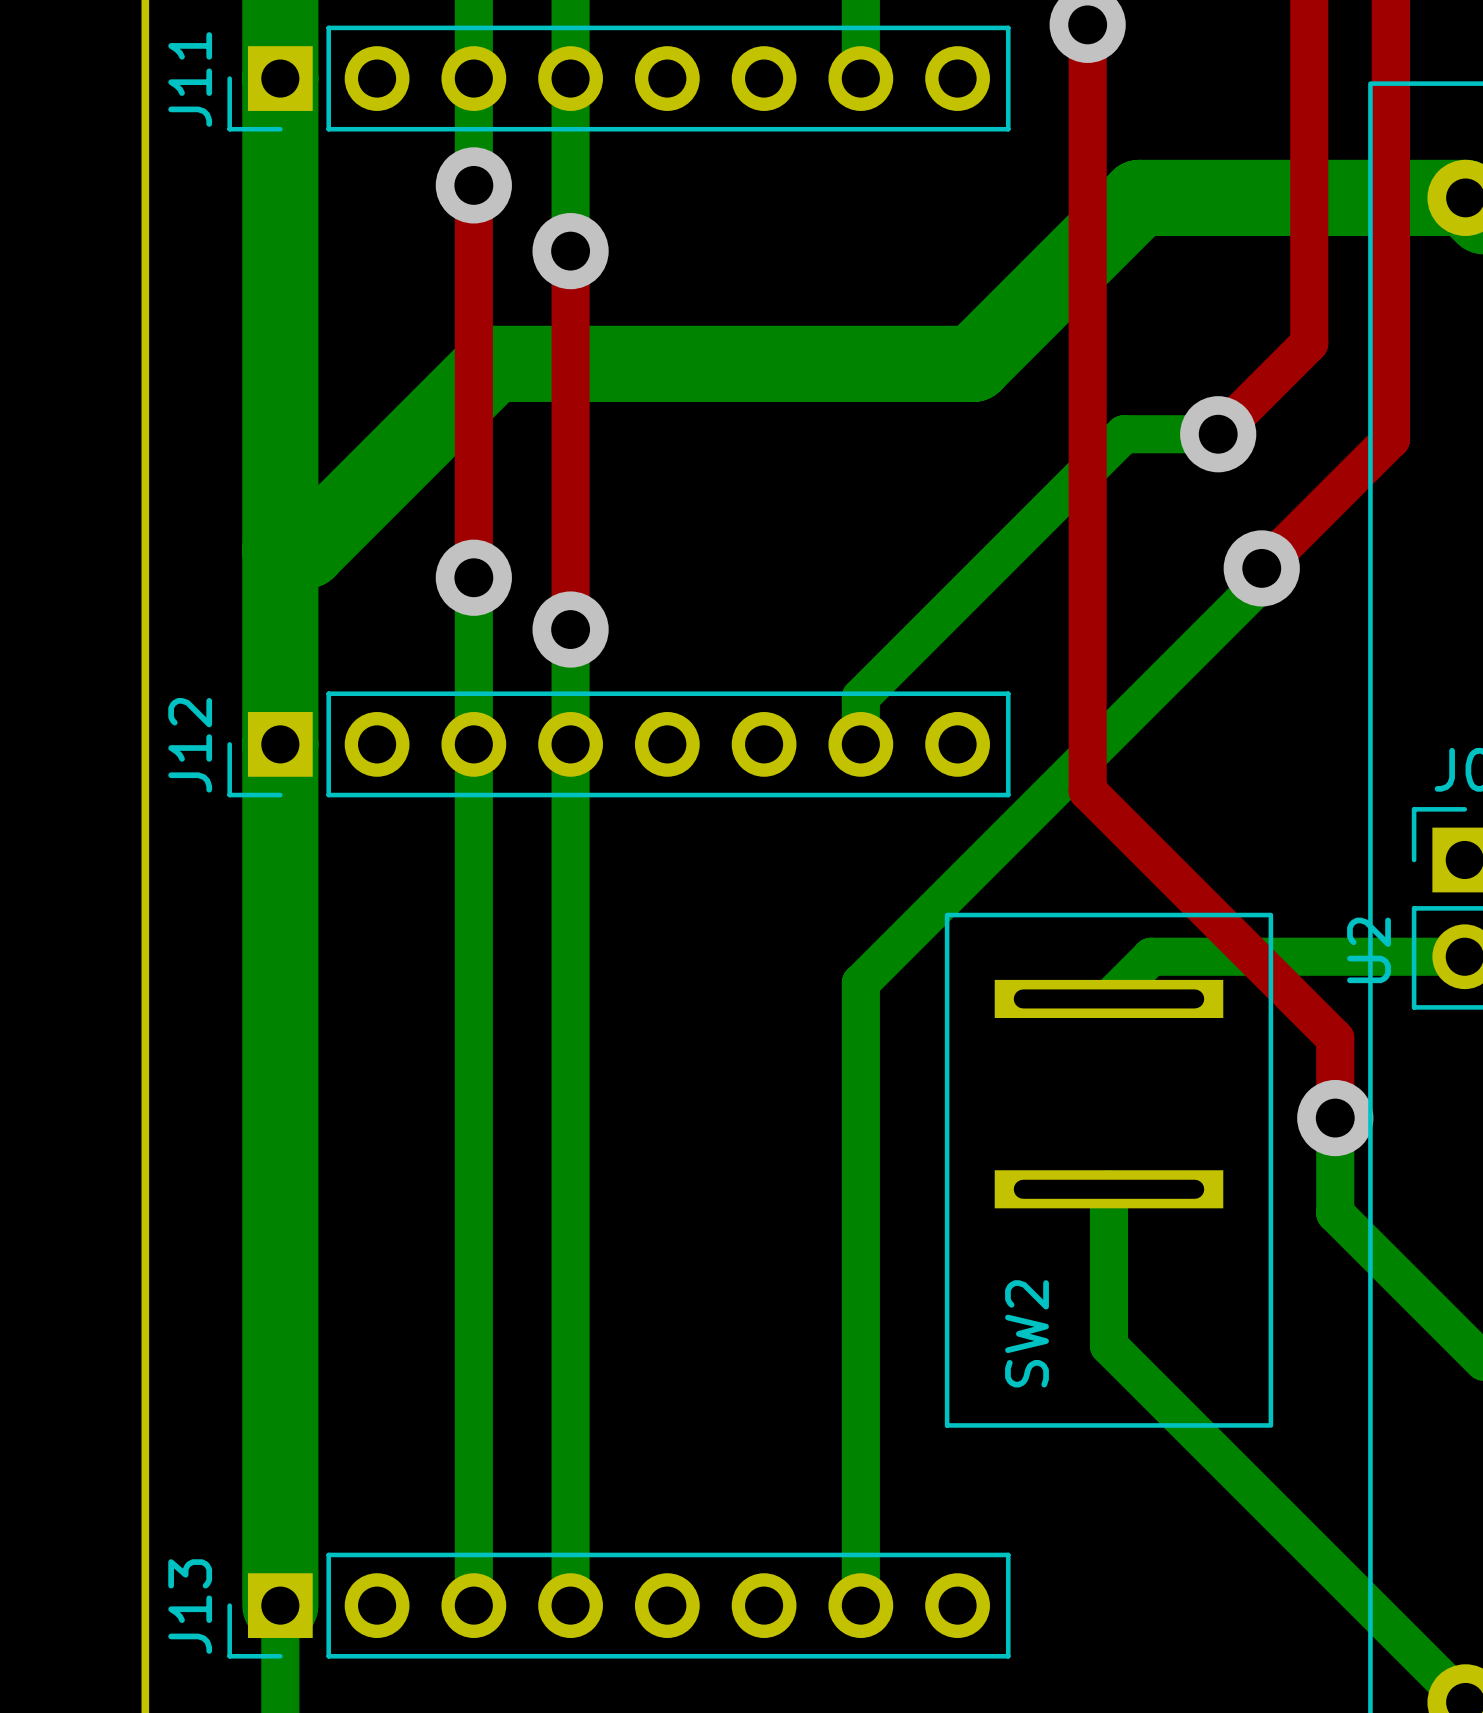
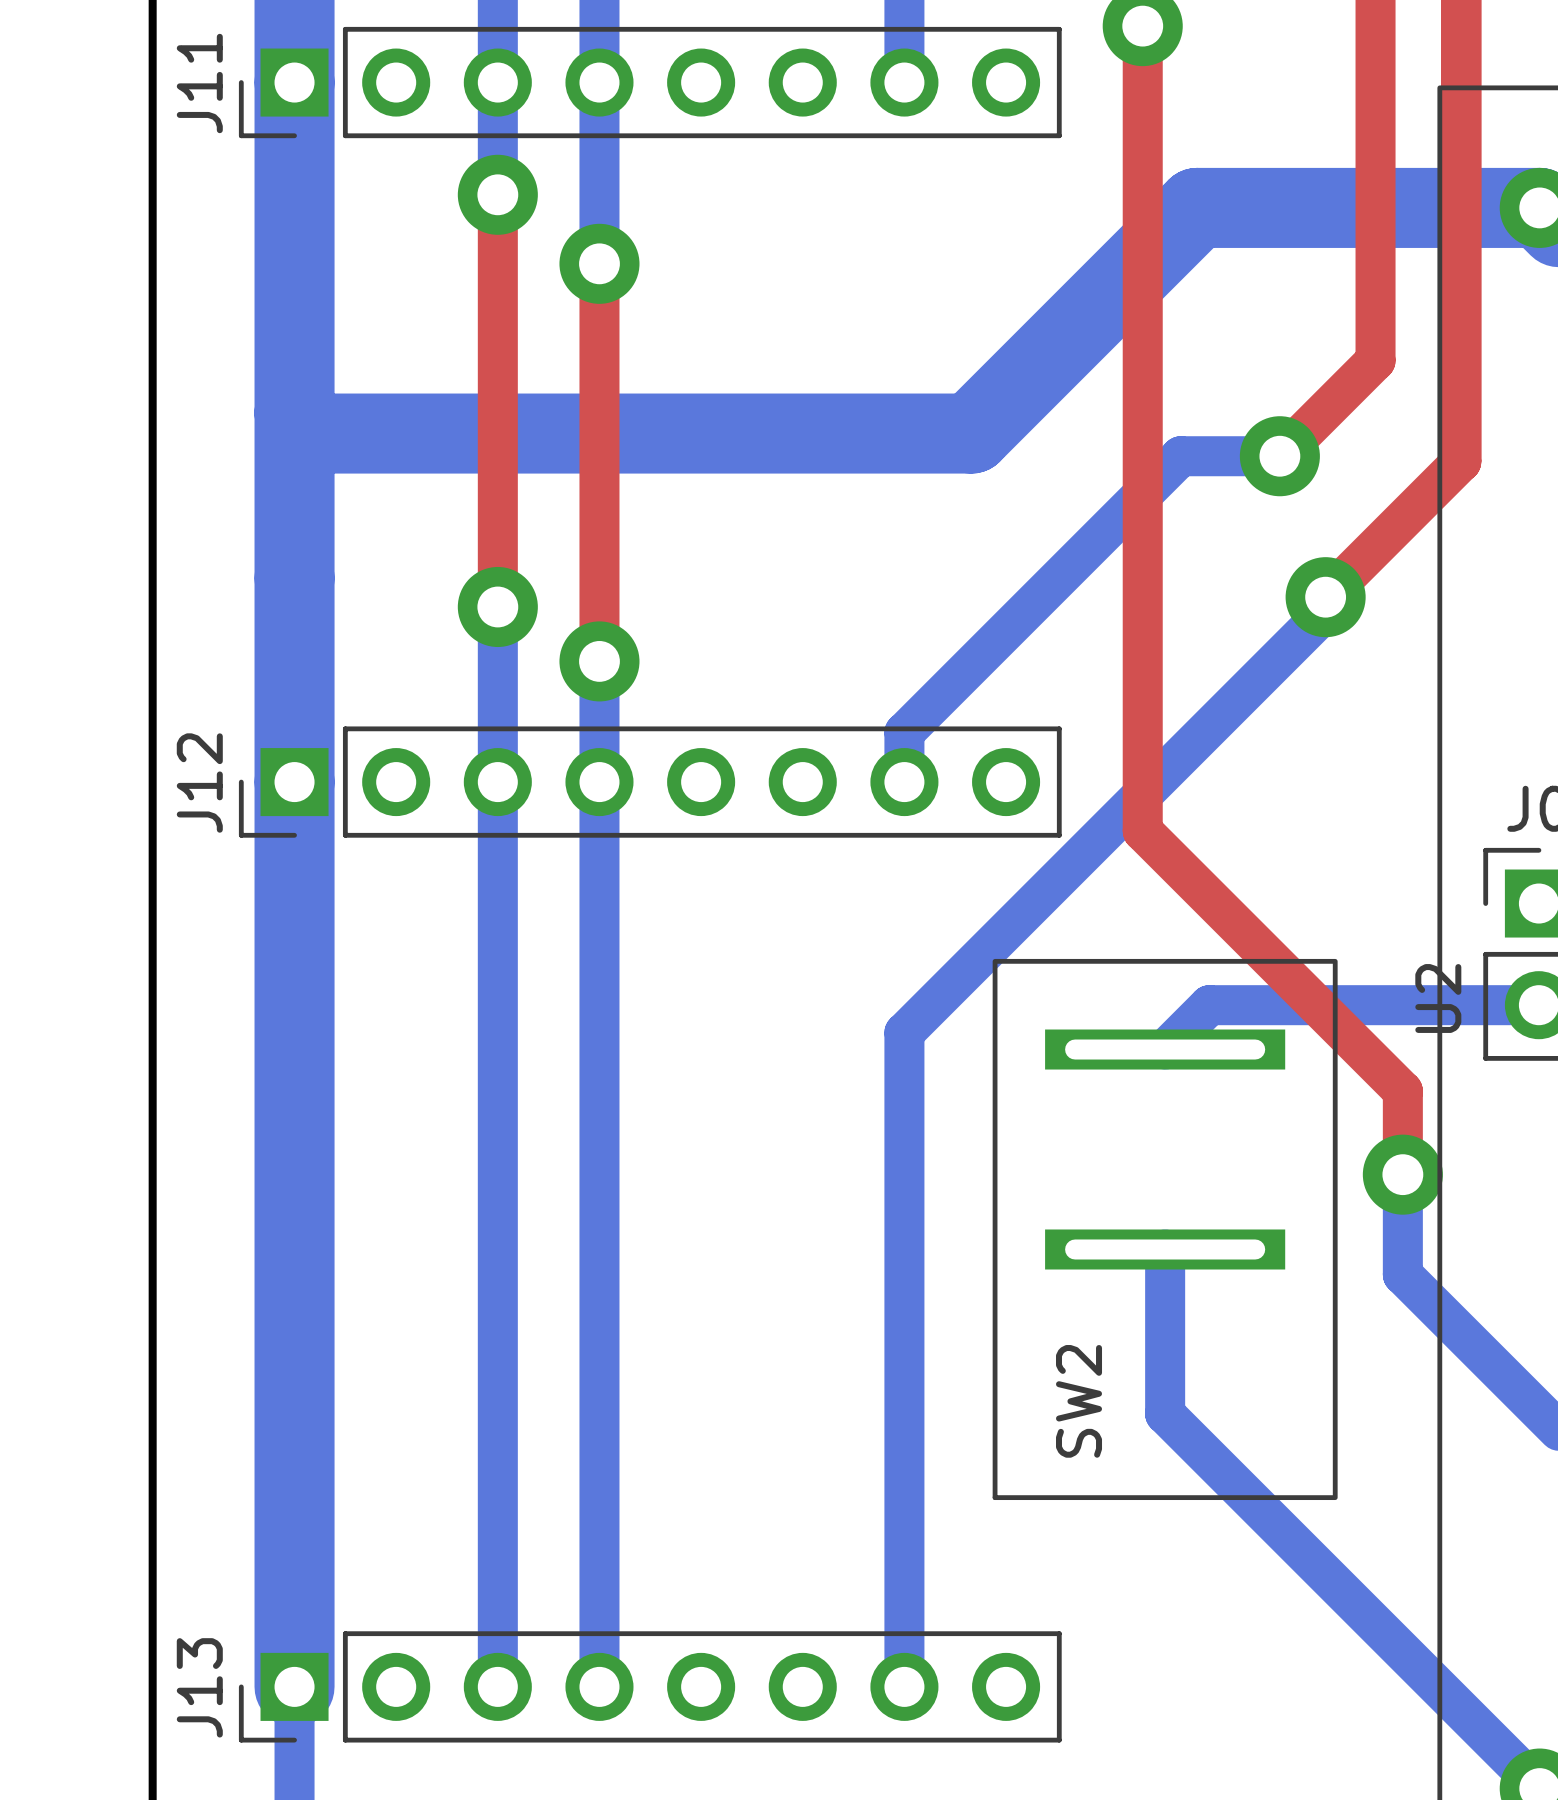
bottom track: (973, 363) (493, 363) (307, 550) (280, 550) -> (1022, 382) (971, 433) (315, 433) (294, 412)

